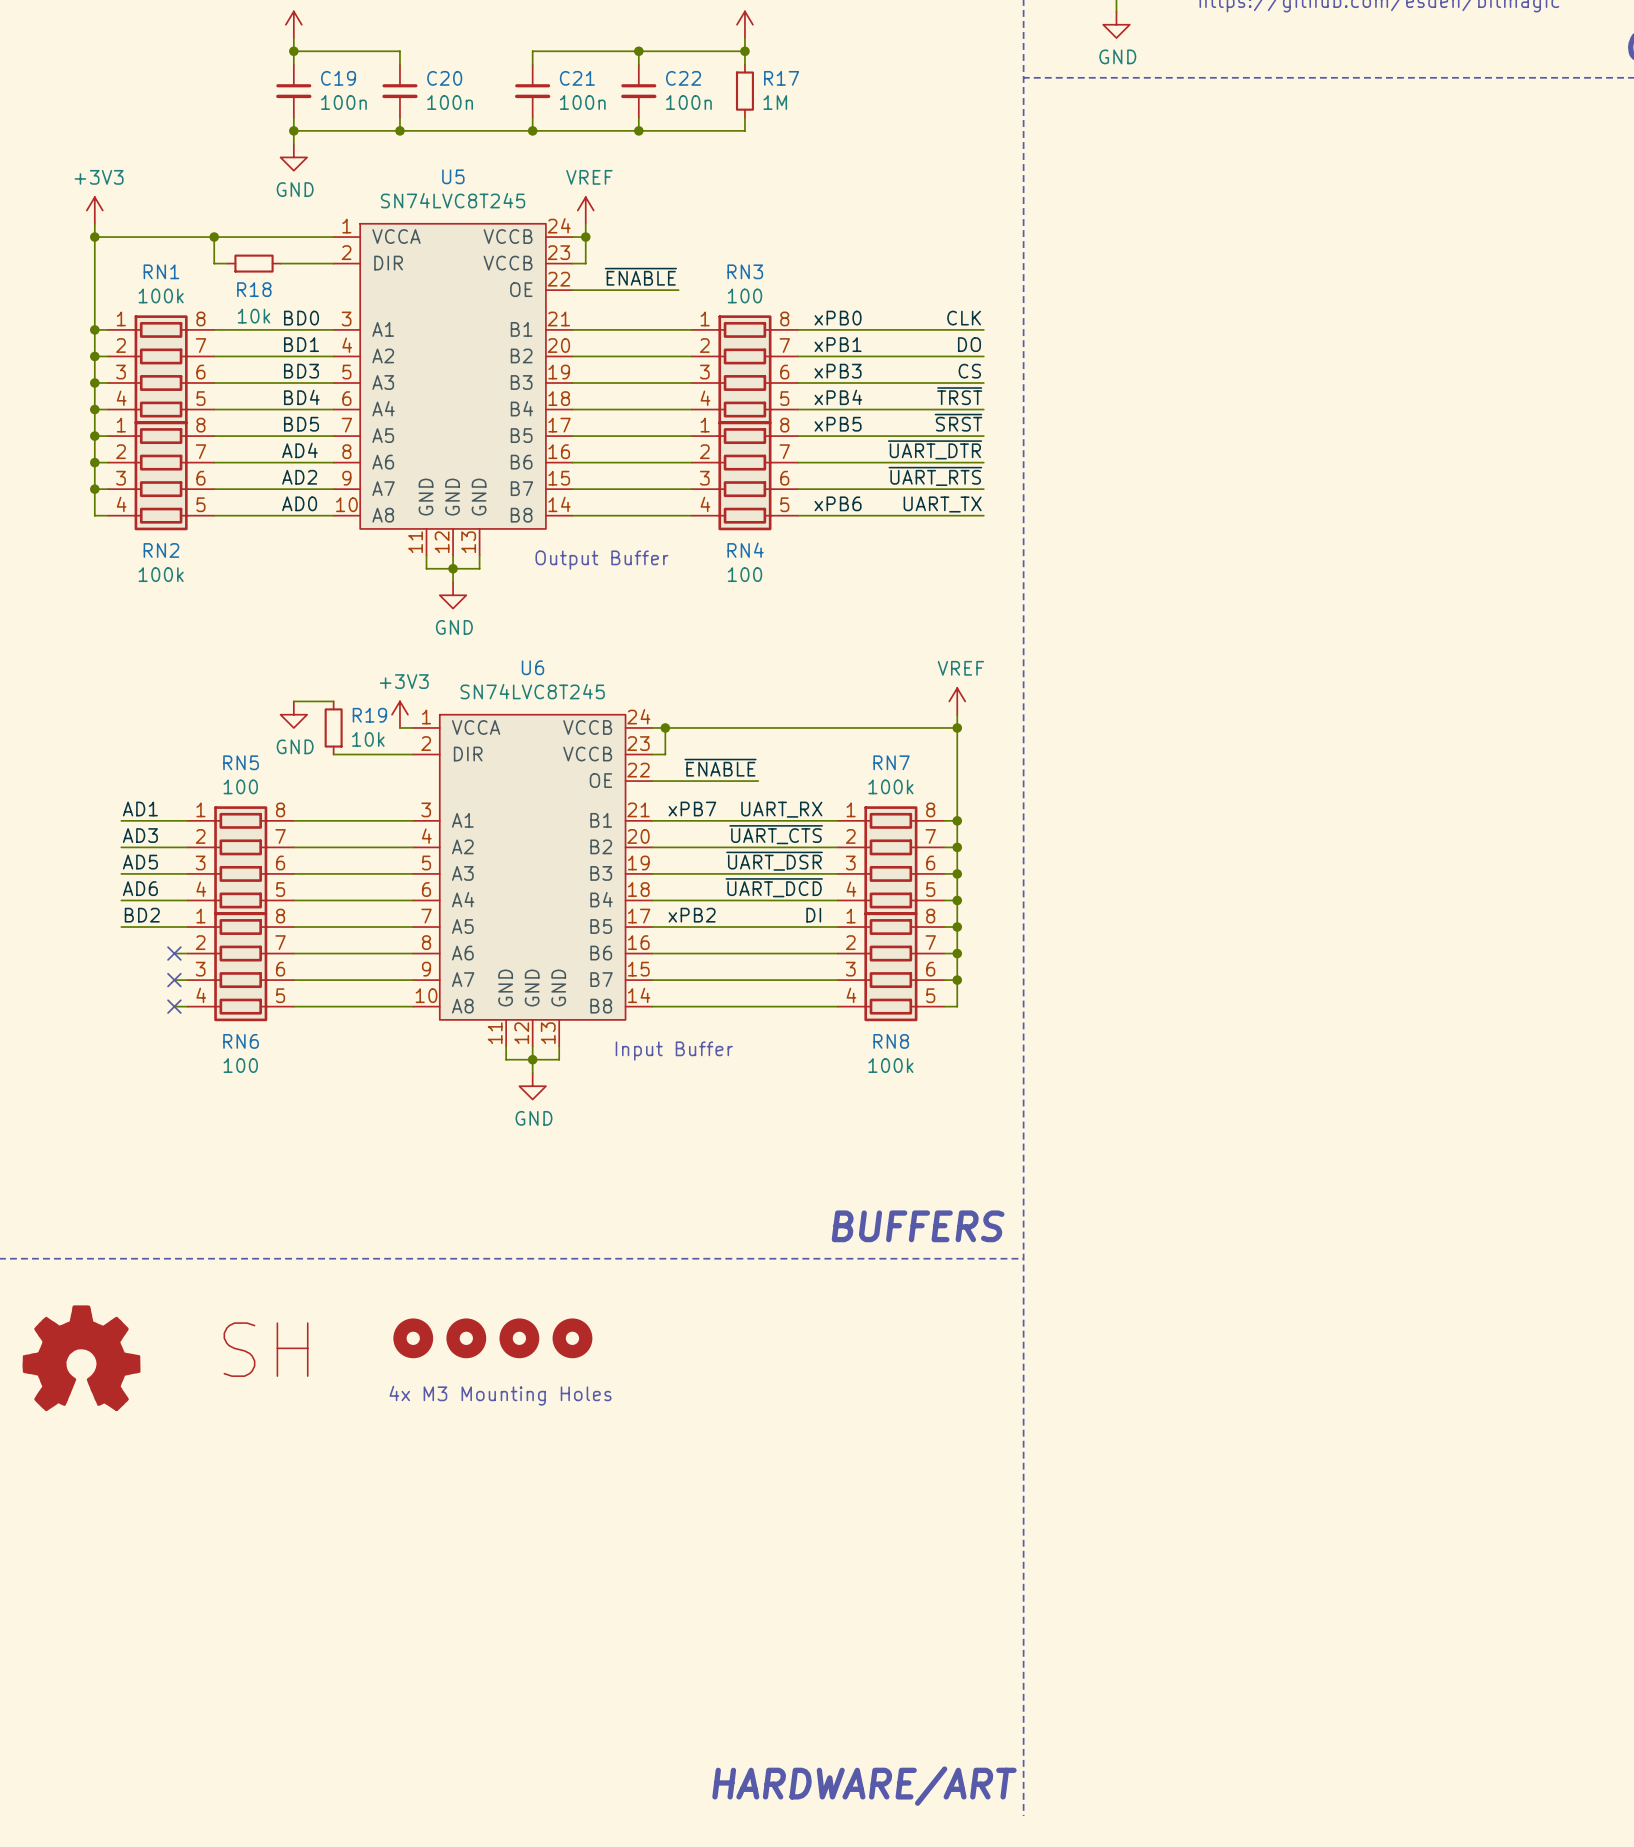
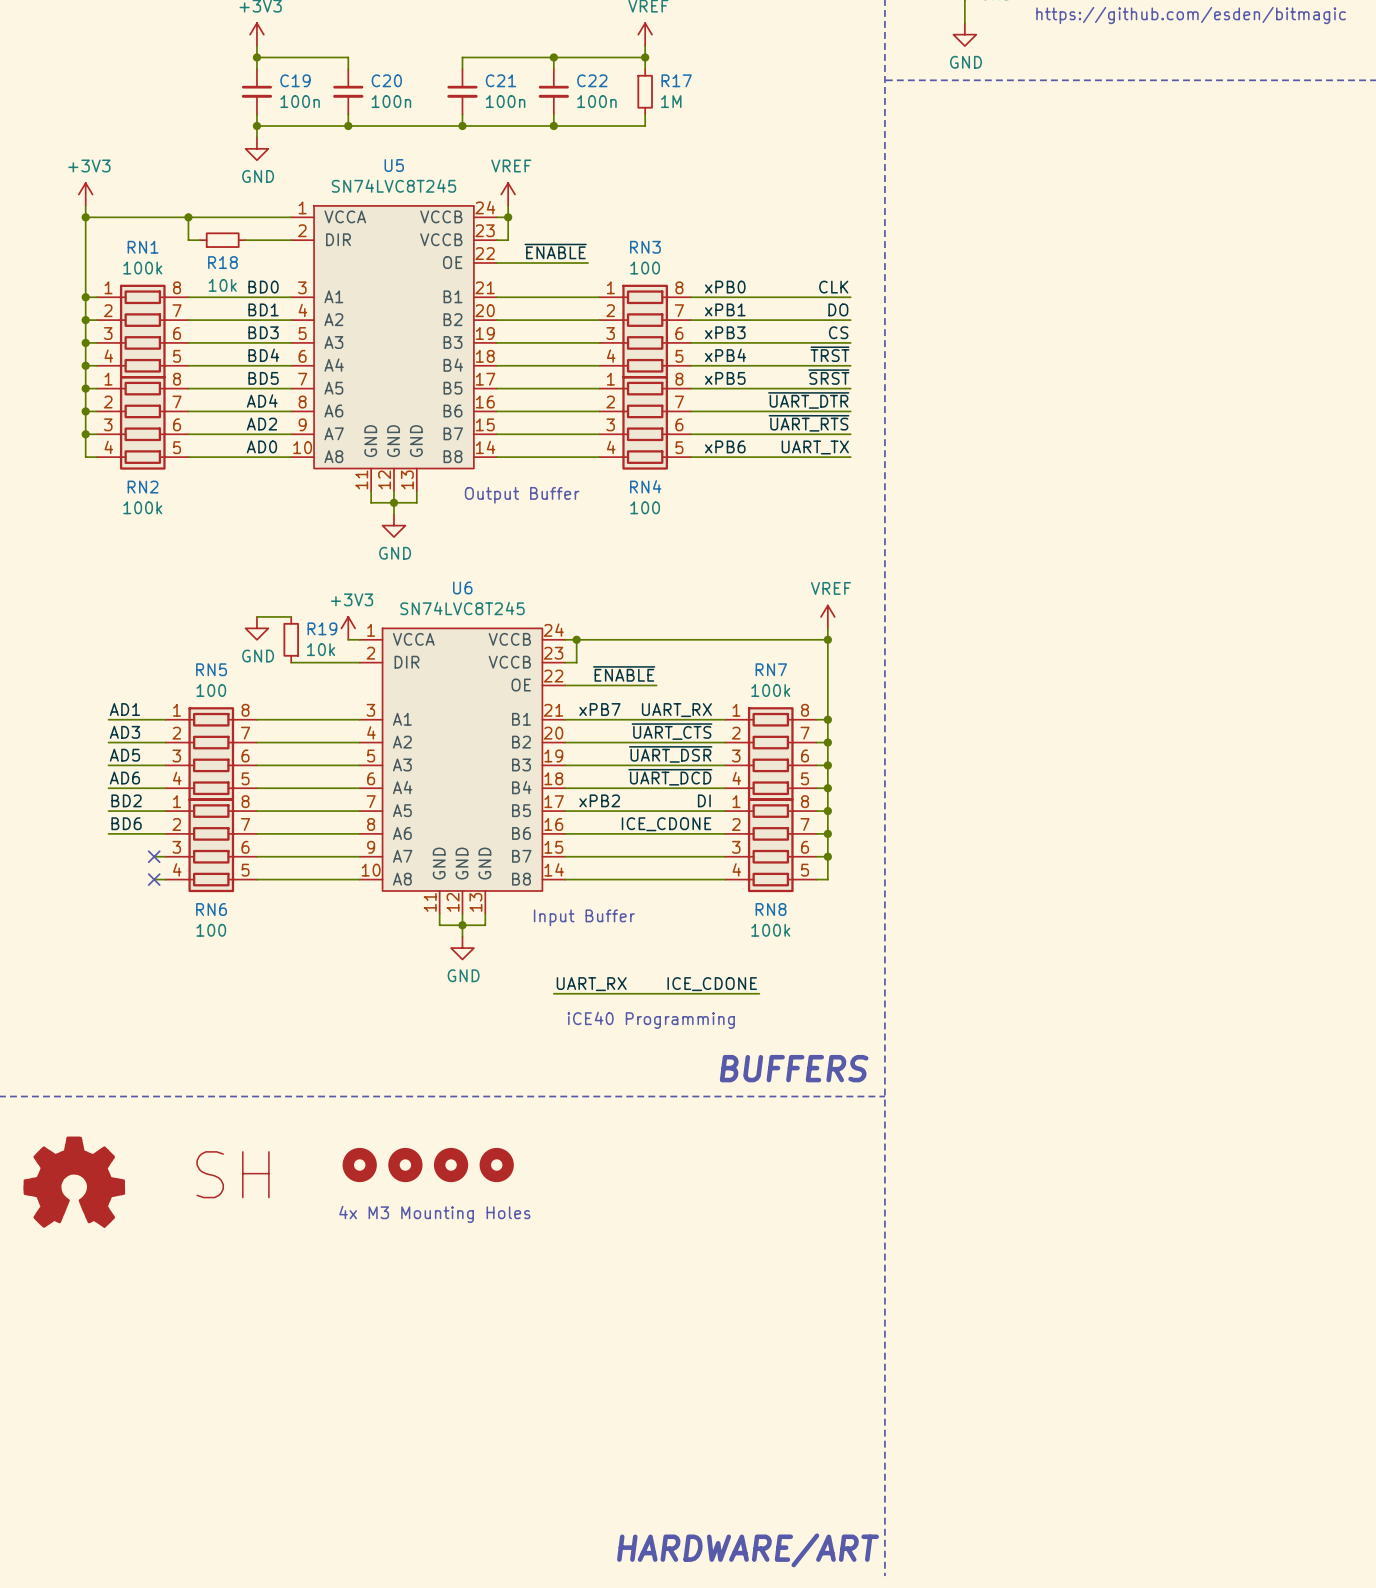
label: none -> BD6 (126, 823)
label: none -> ICE_CDONE (666, 824)
wire: none -> (108, 833) (154, 833)
no-connect mark: (174, 953) -> none
label: none -> UART_RX (591, 984)
label: none -> ICE_CDONE (712, 984)
wire: none -> (553, 993) (759, 993)
text: none -> iCE40 Programming (651, 1020)

